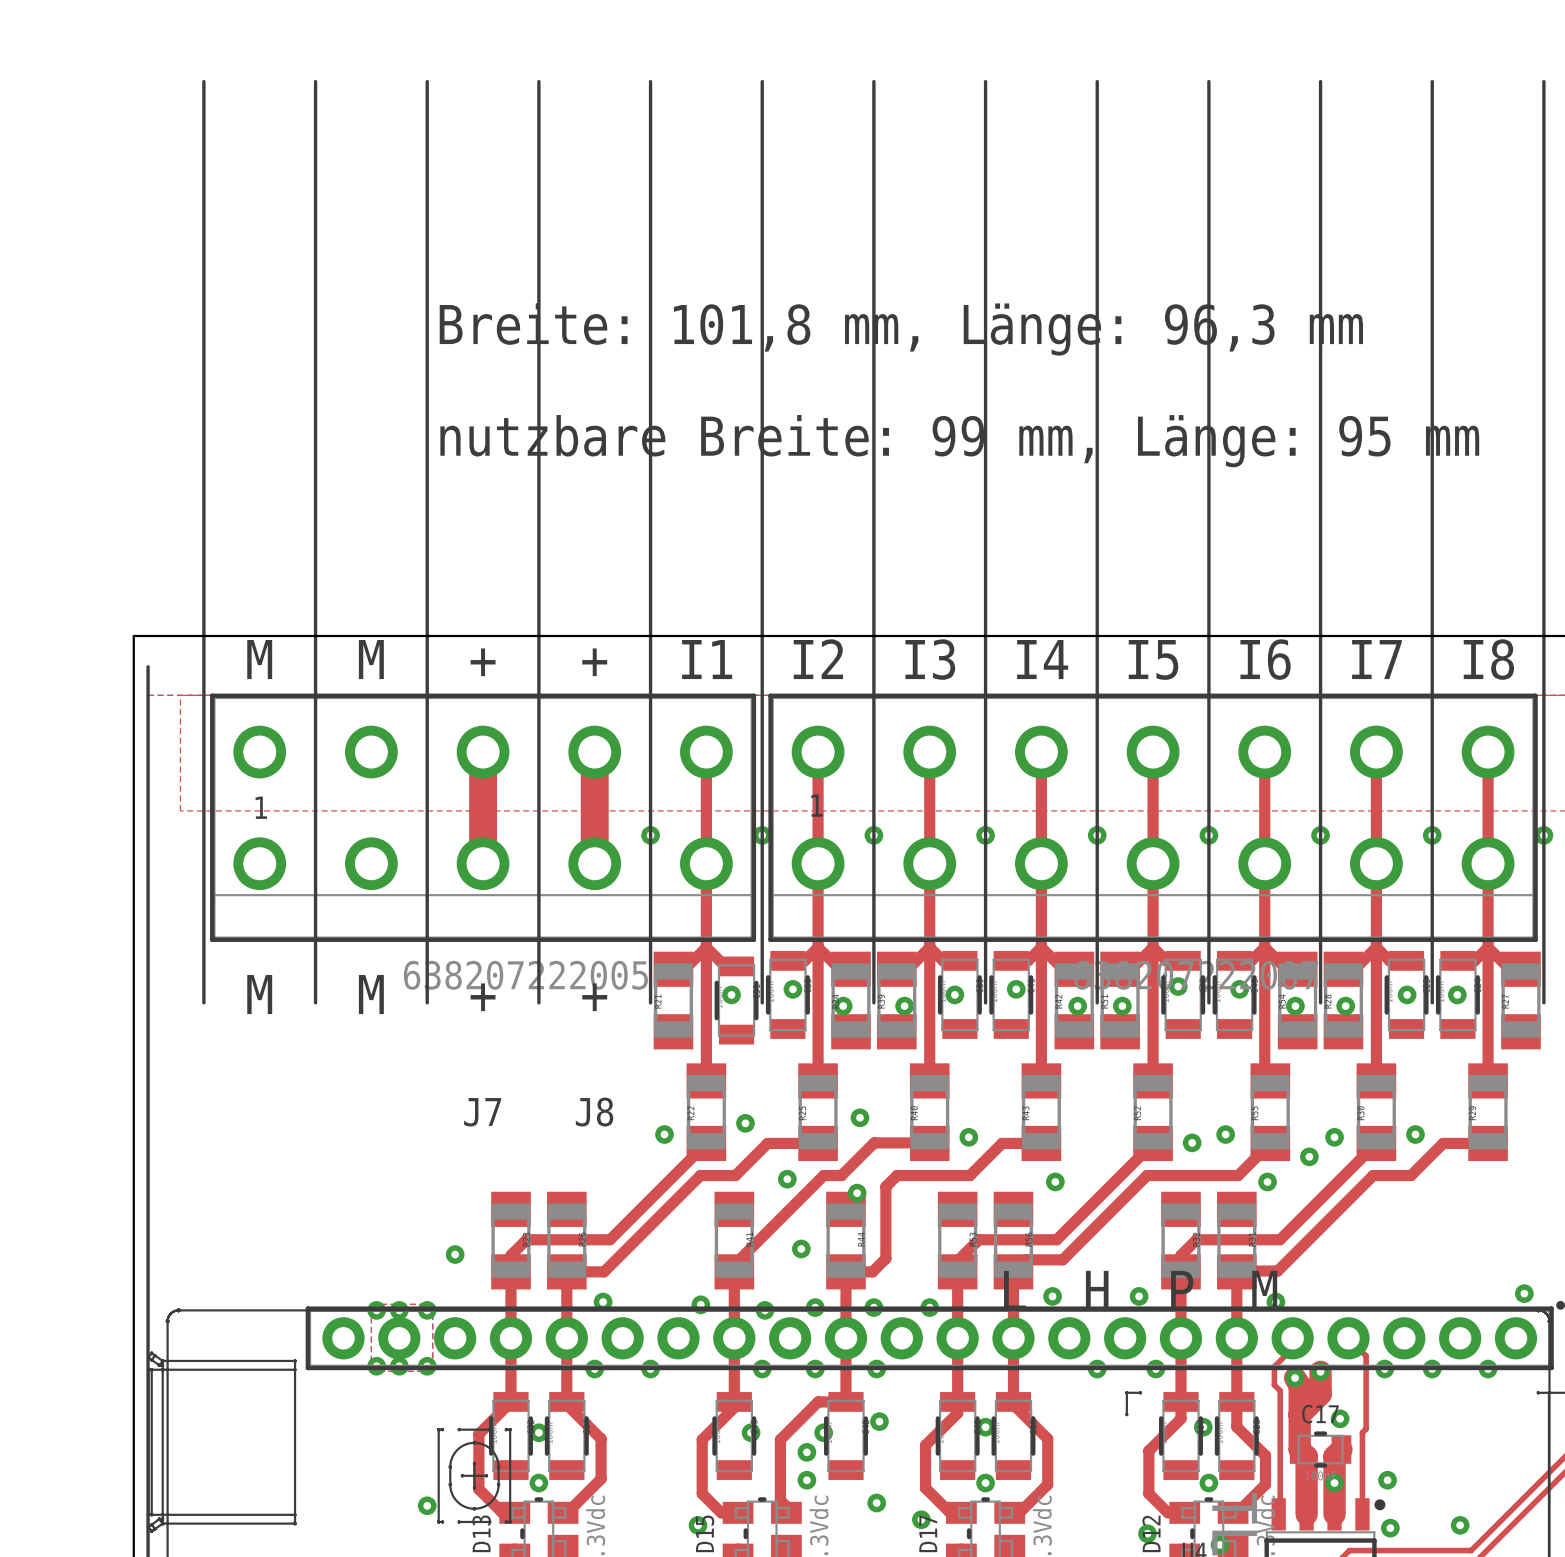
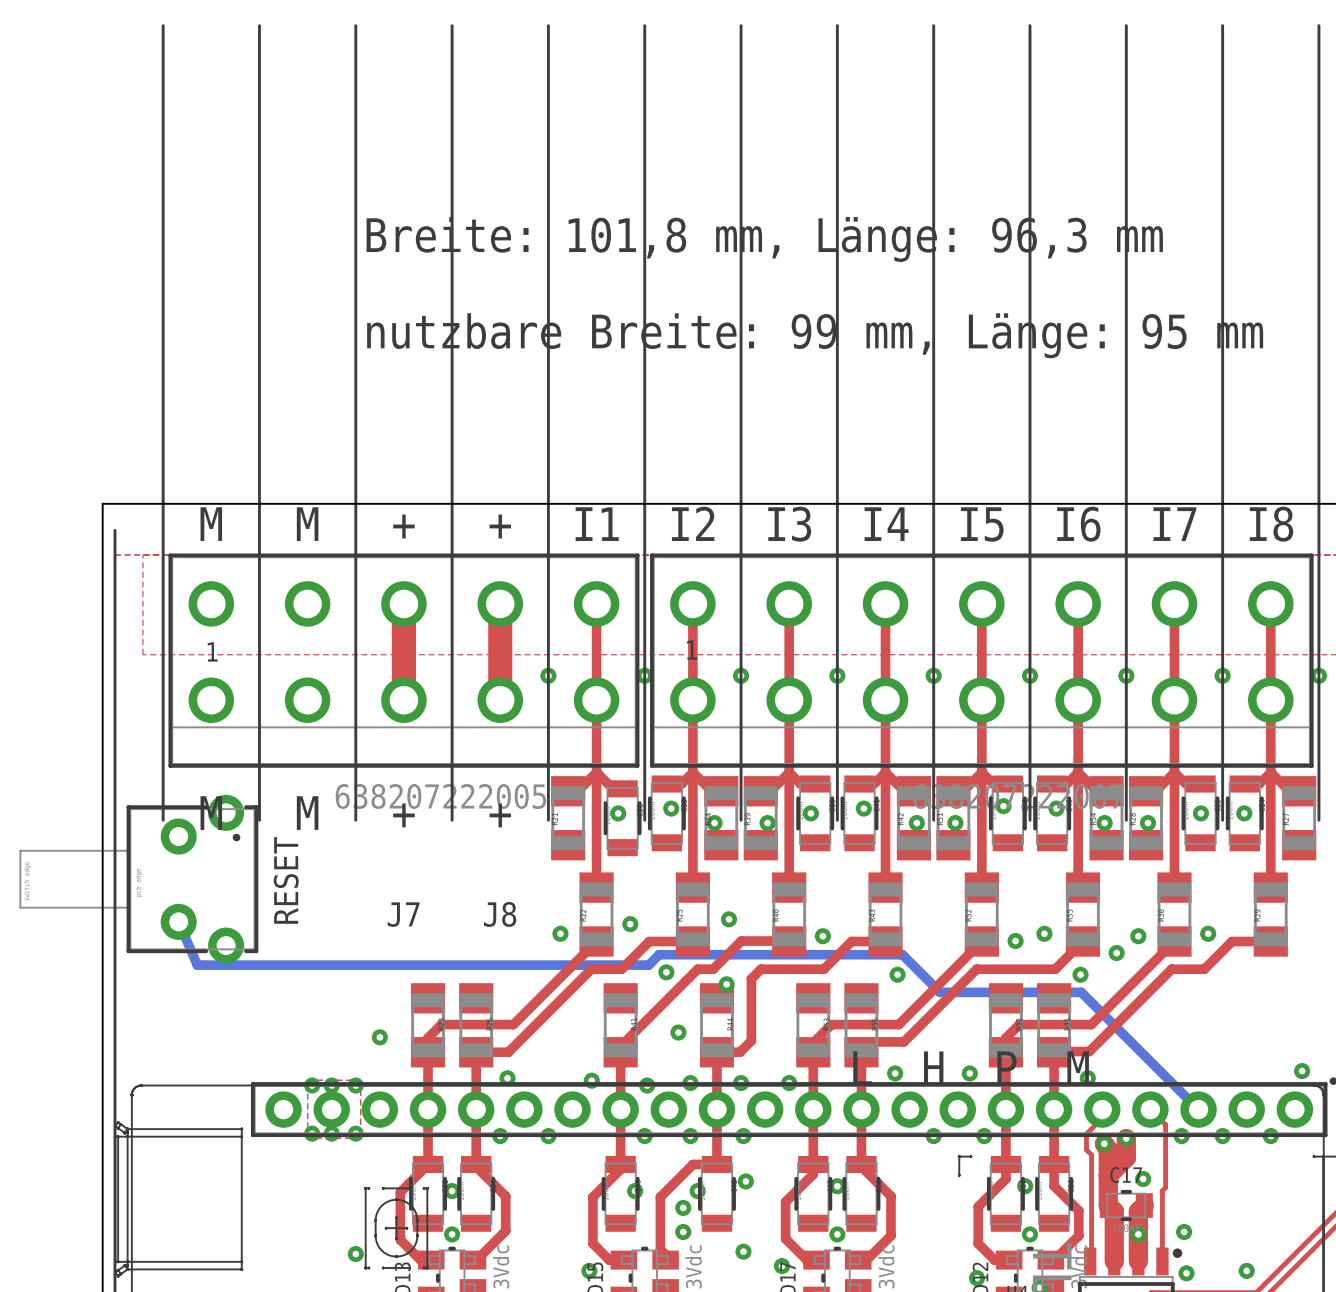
RESET: none -> (138, 879)
bottom track: none -> (178, 921) (197, 965) (648, 965) (659, 954) (902, 954) (940, 992) (1081, 992) (1198, 1109)

